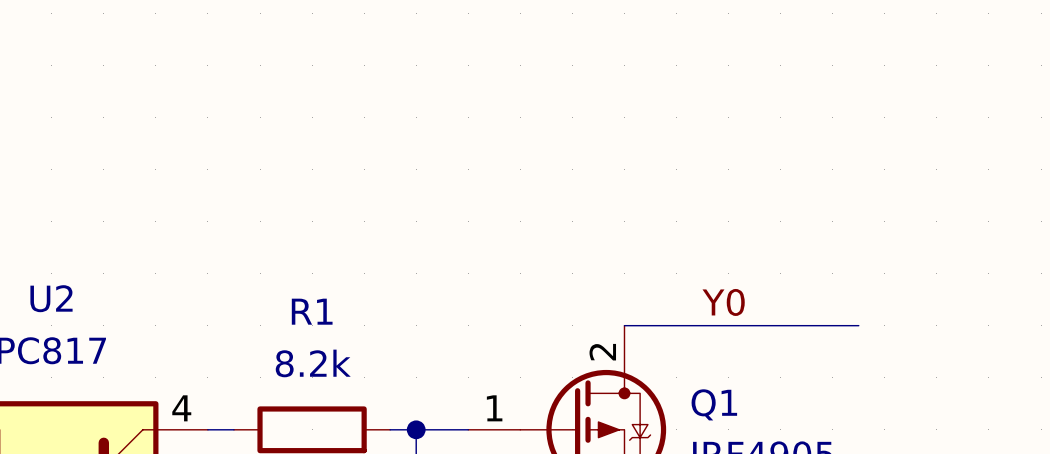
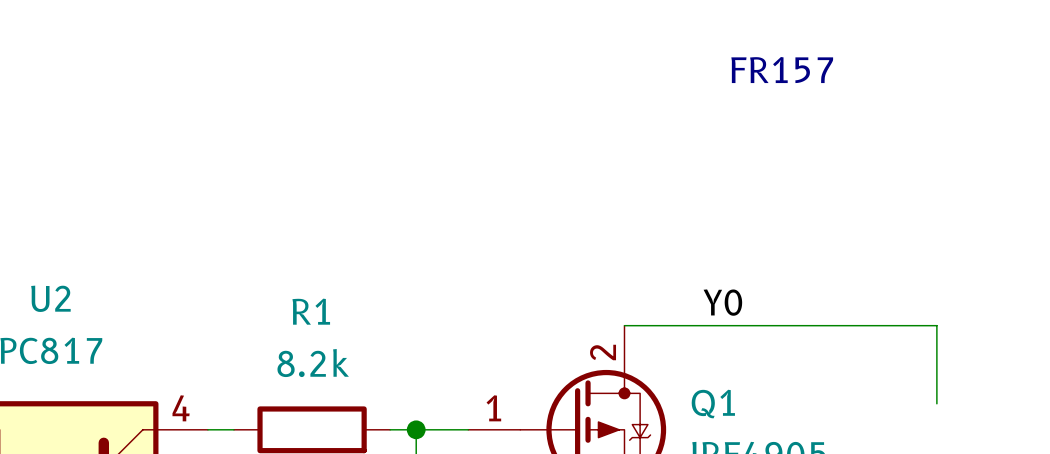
text: none -> FR157 (782, 70)
wire: none -> (858, 325) (936, 325) (936, 403)

